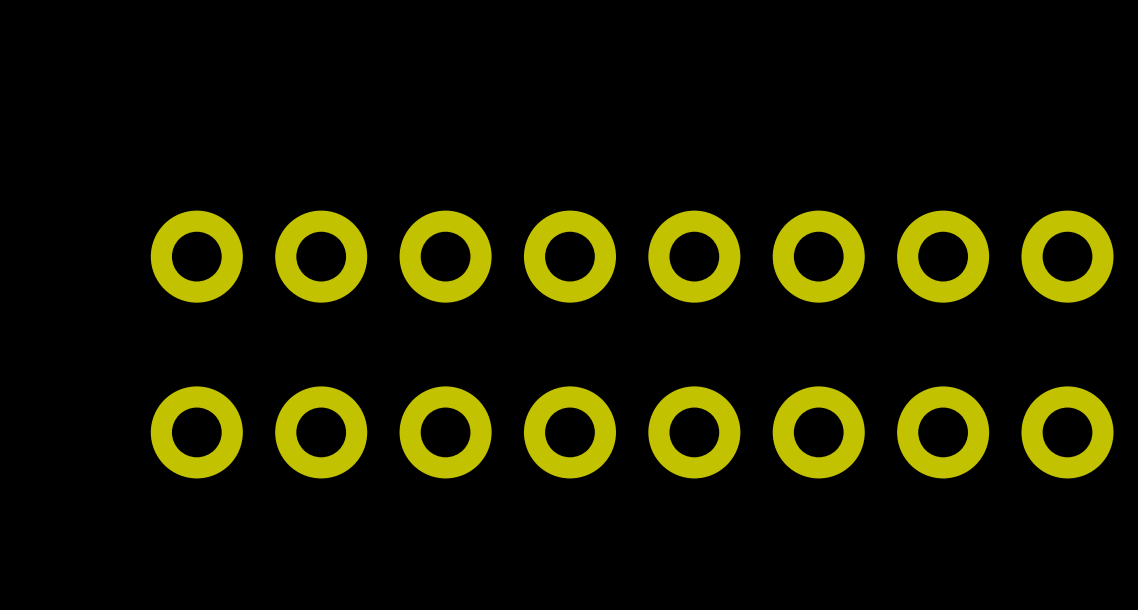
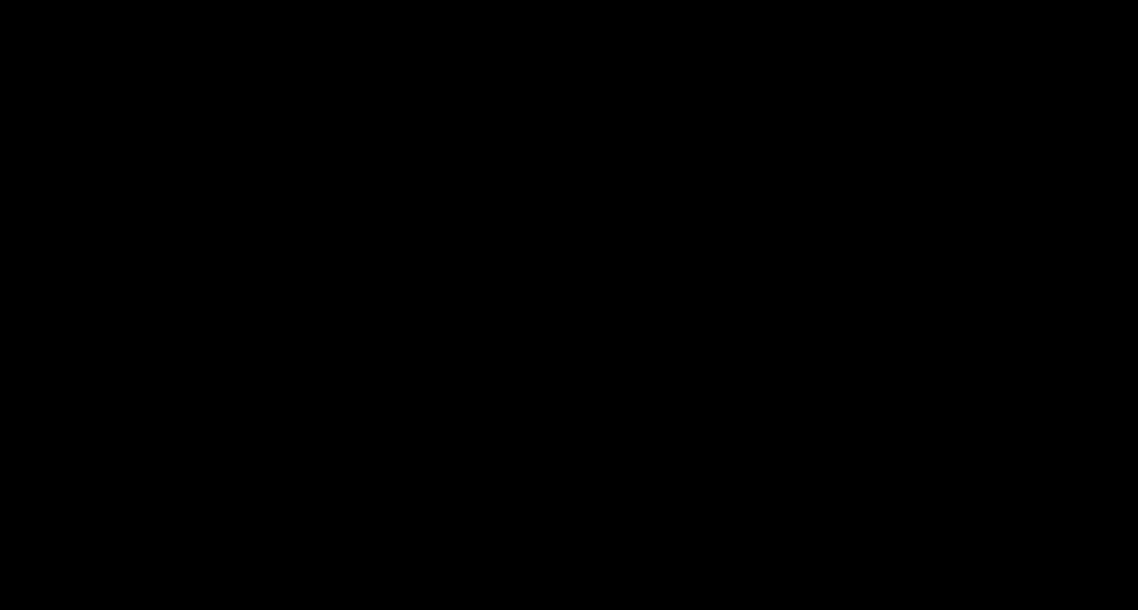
part: (632, 256) -> none
part: (632, 432) -> none

